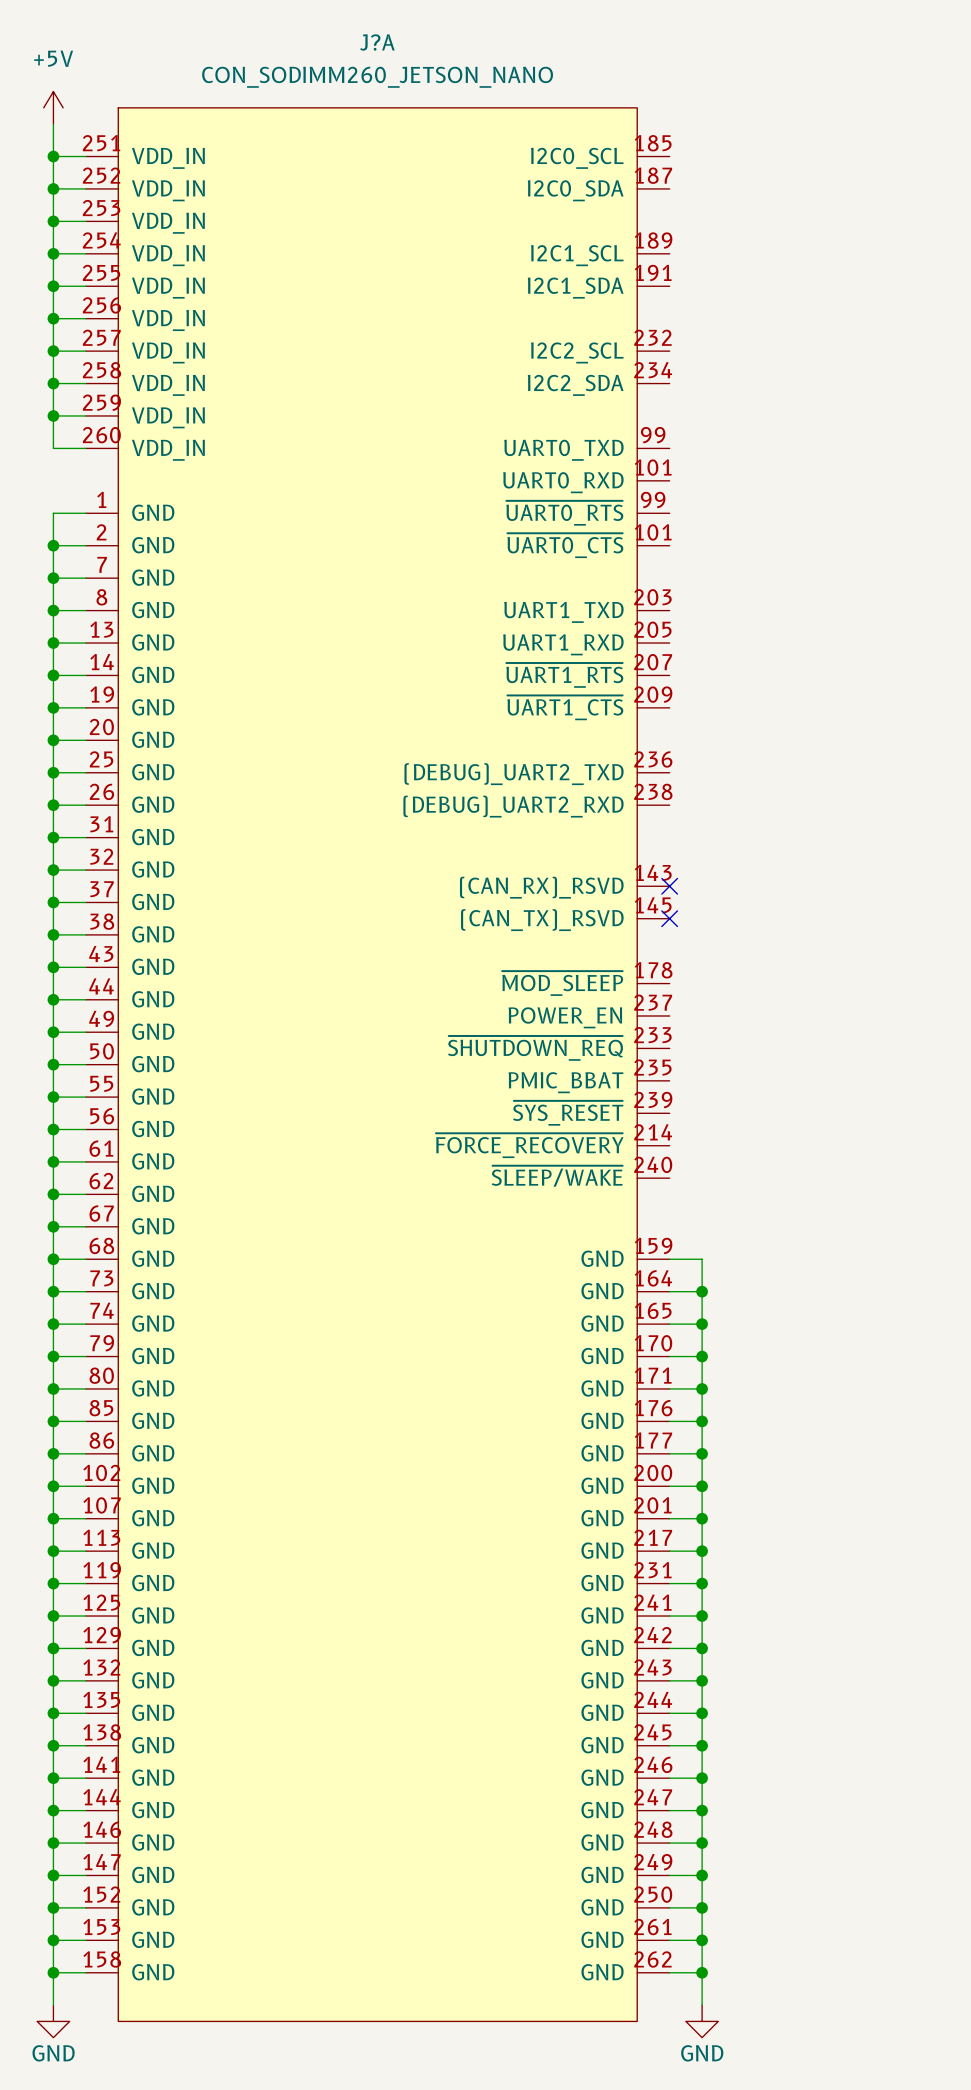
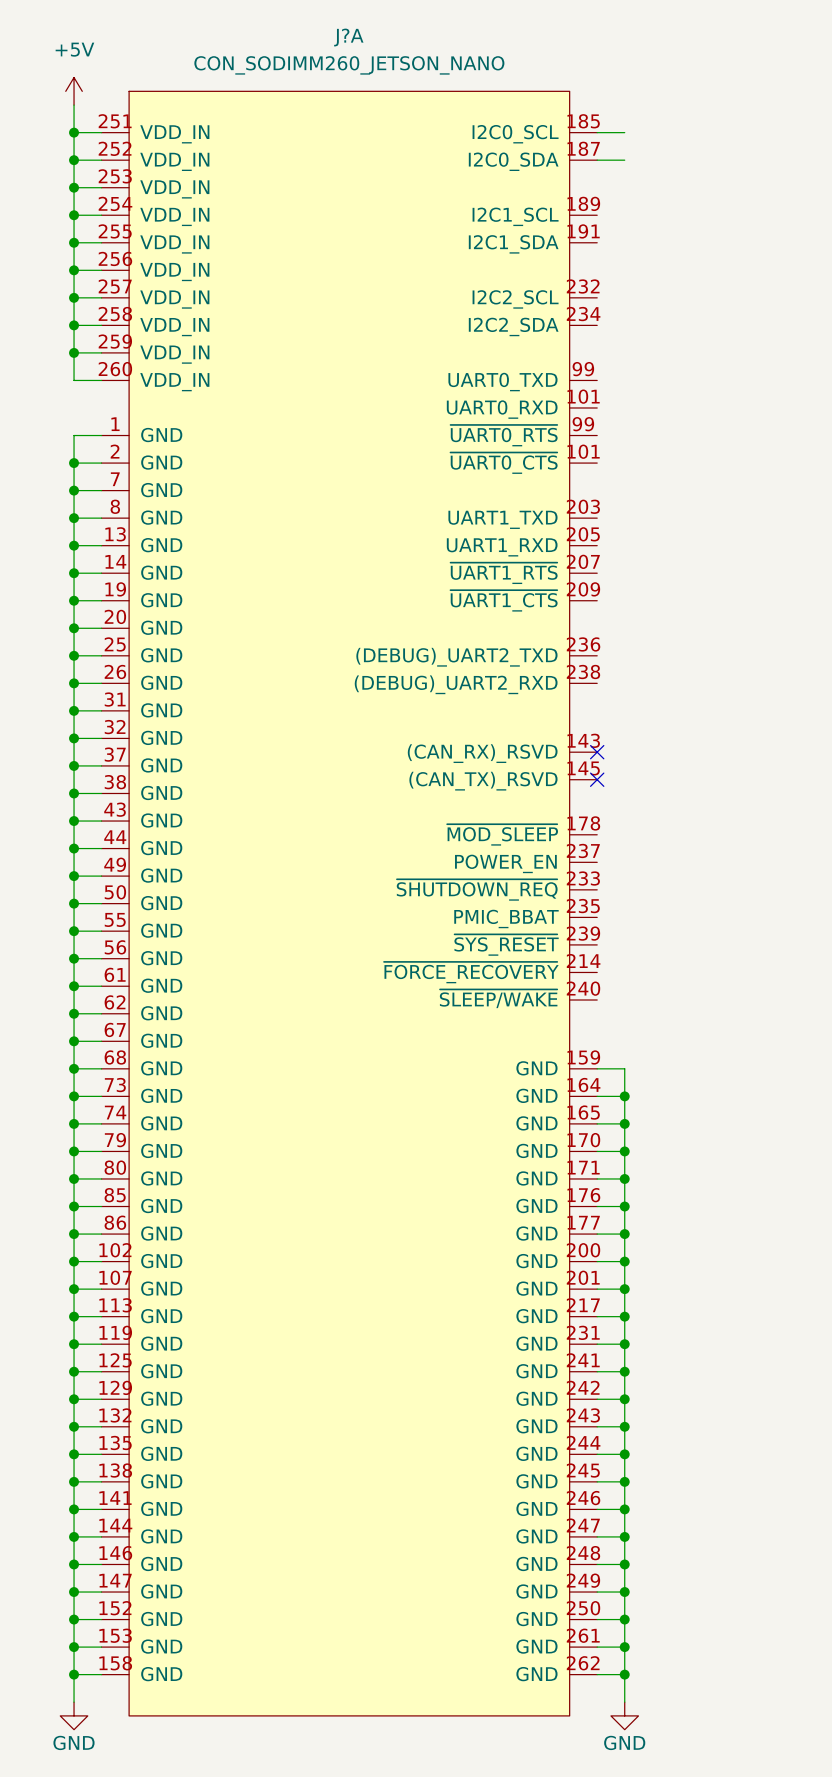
wire: none -> (597, 132) (624, 132)
wire: none -> (597, 160) (624, 160)

